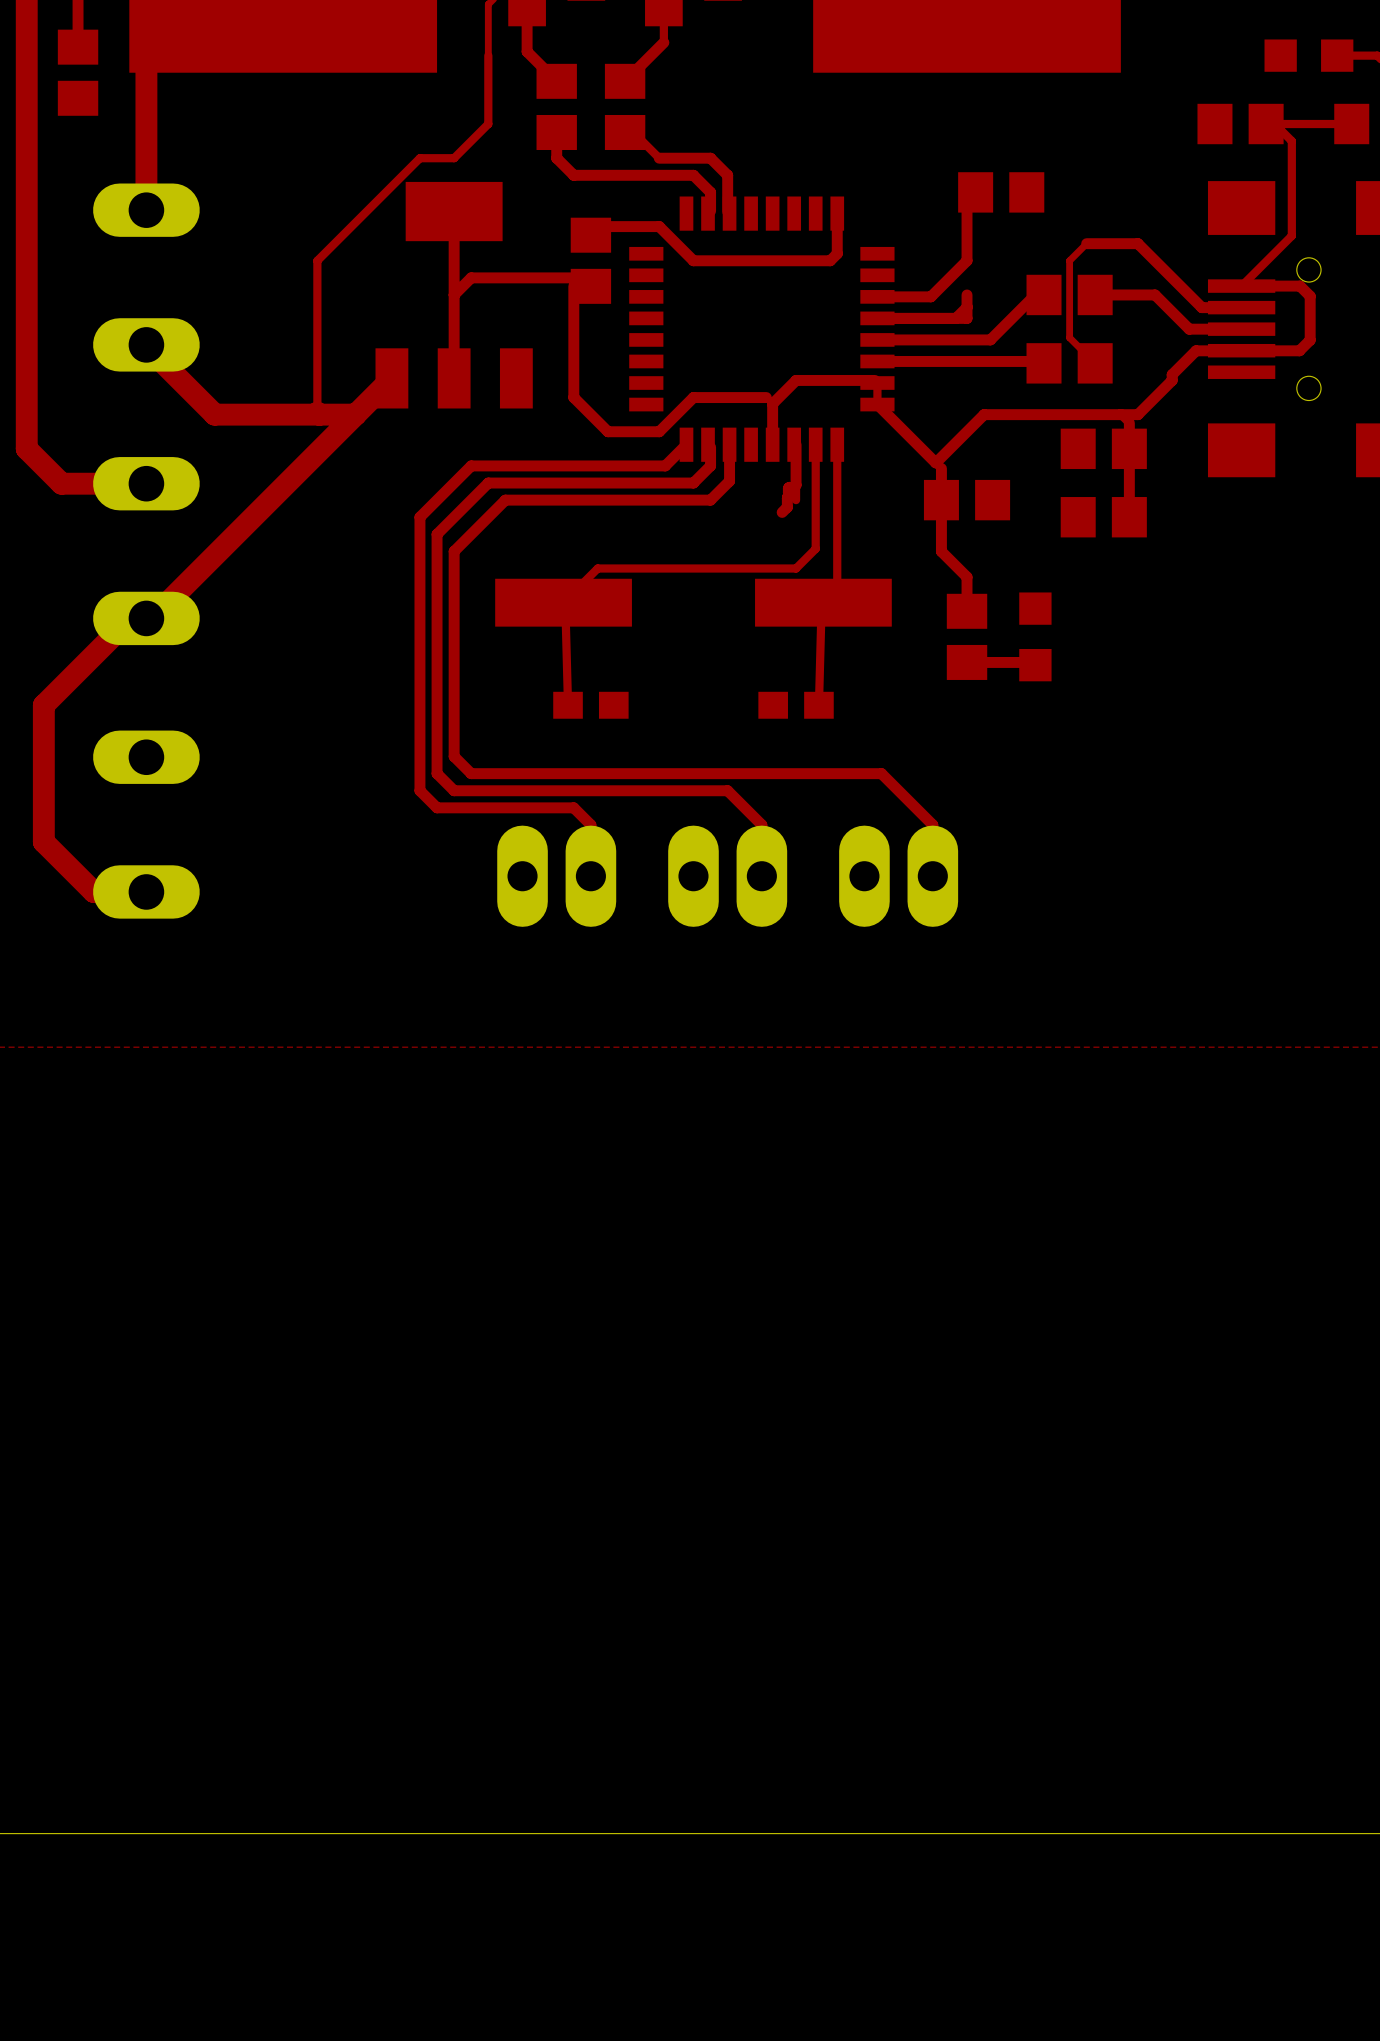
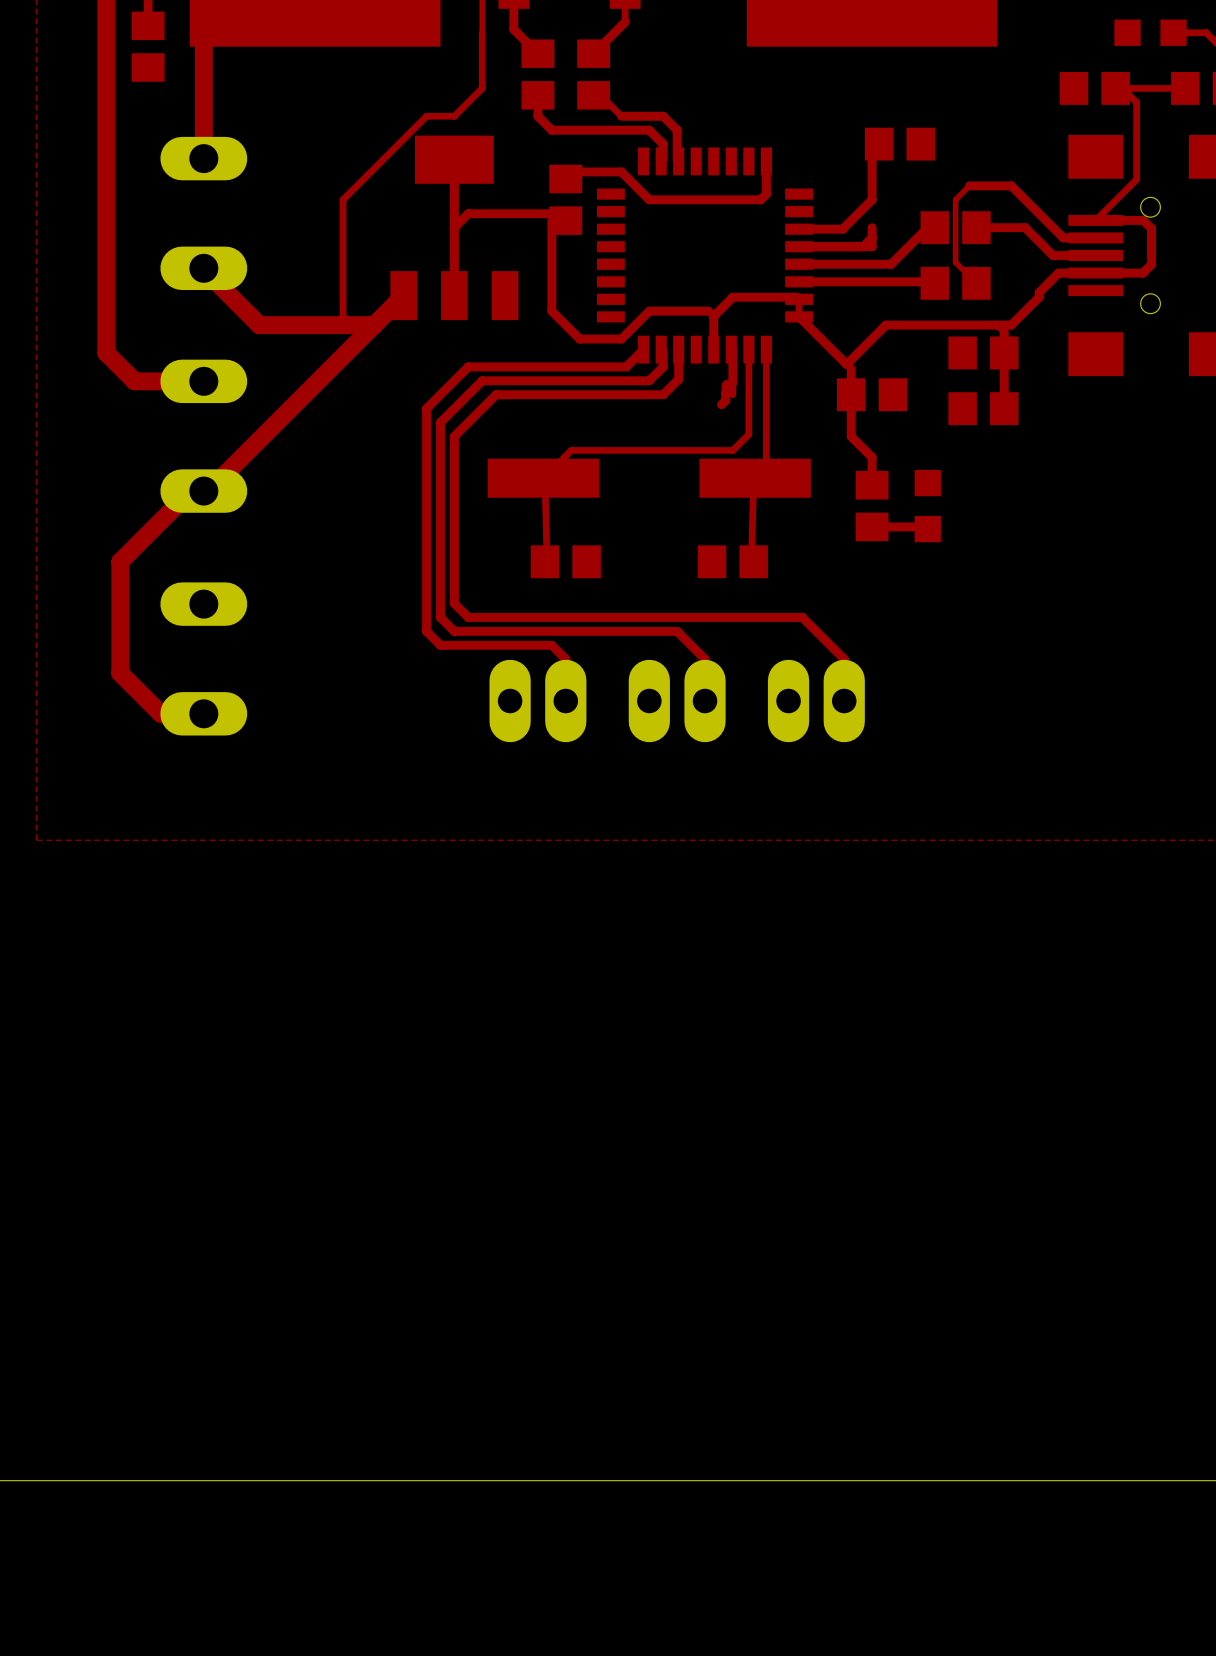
part footprint: [553, 691, 629, 719] -> [530, 545, 601, 579]
part footprint: [758, 691, 834, 719] -> [697, 545, 768, 579]

